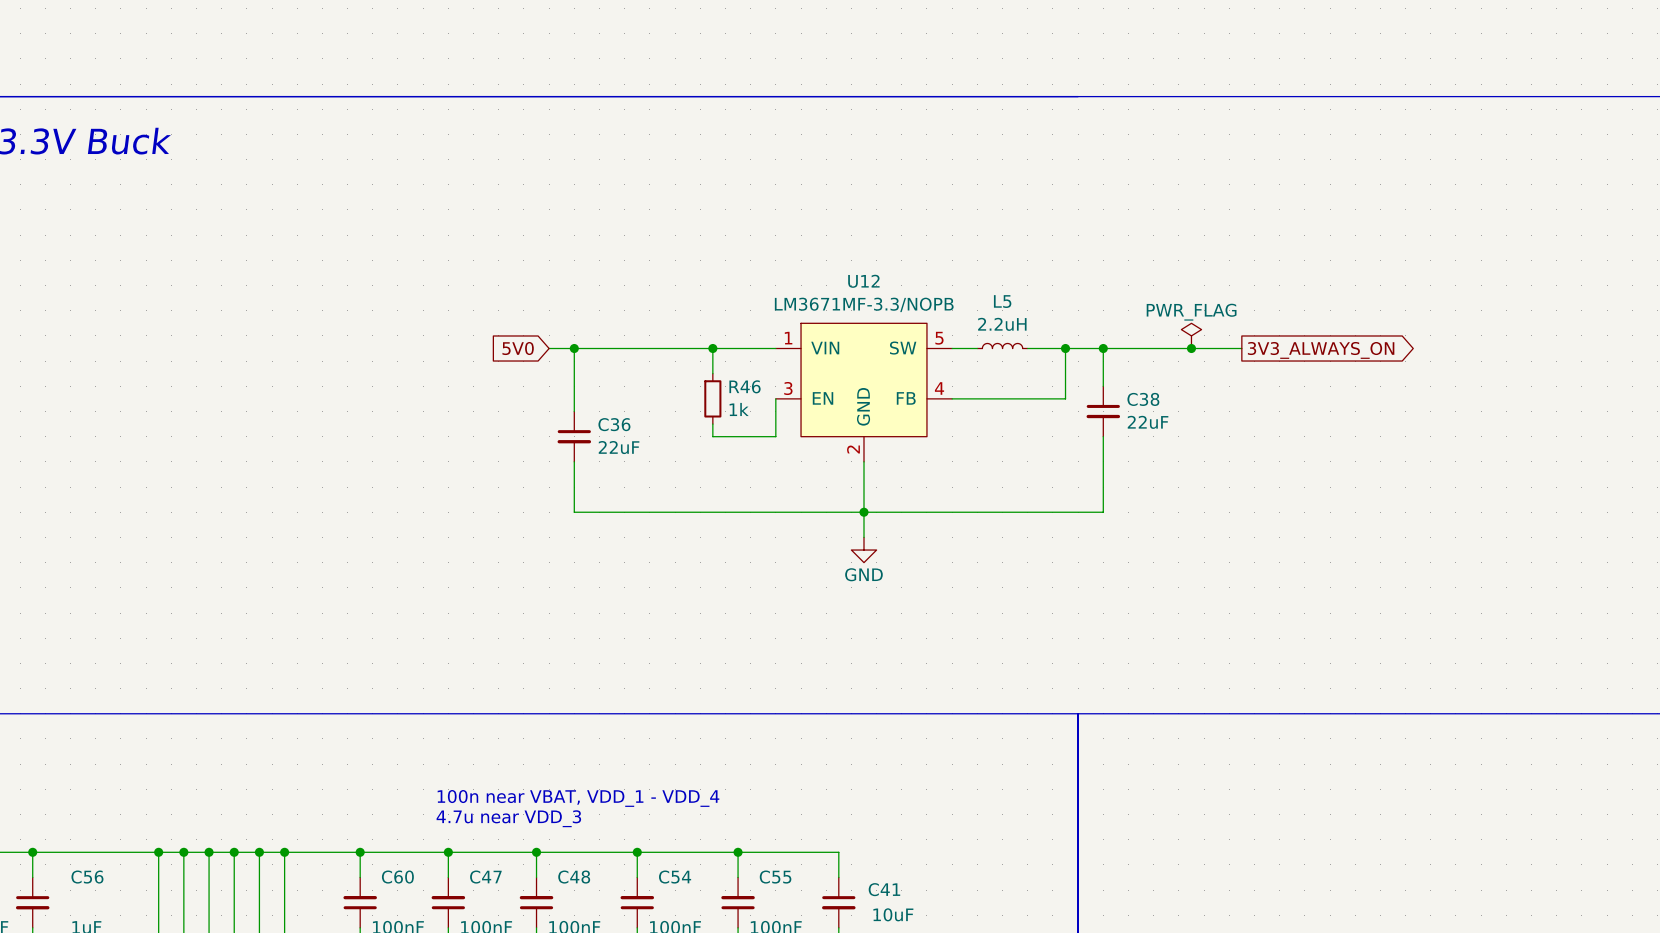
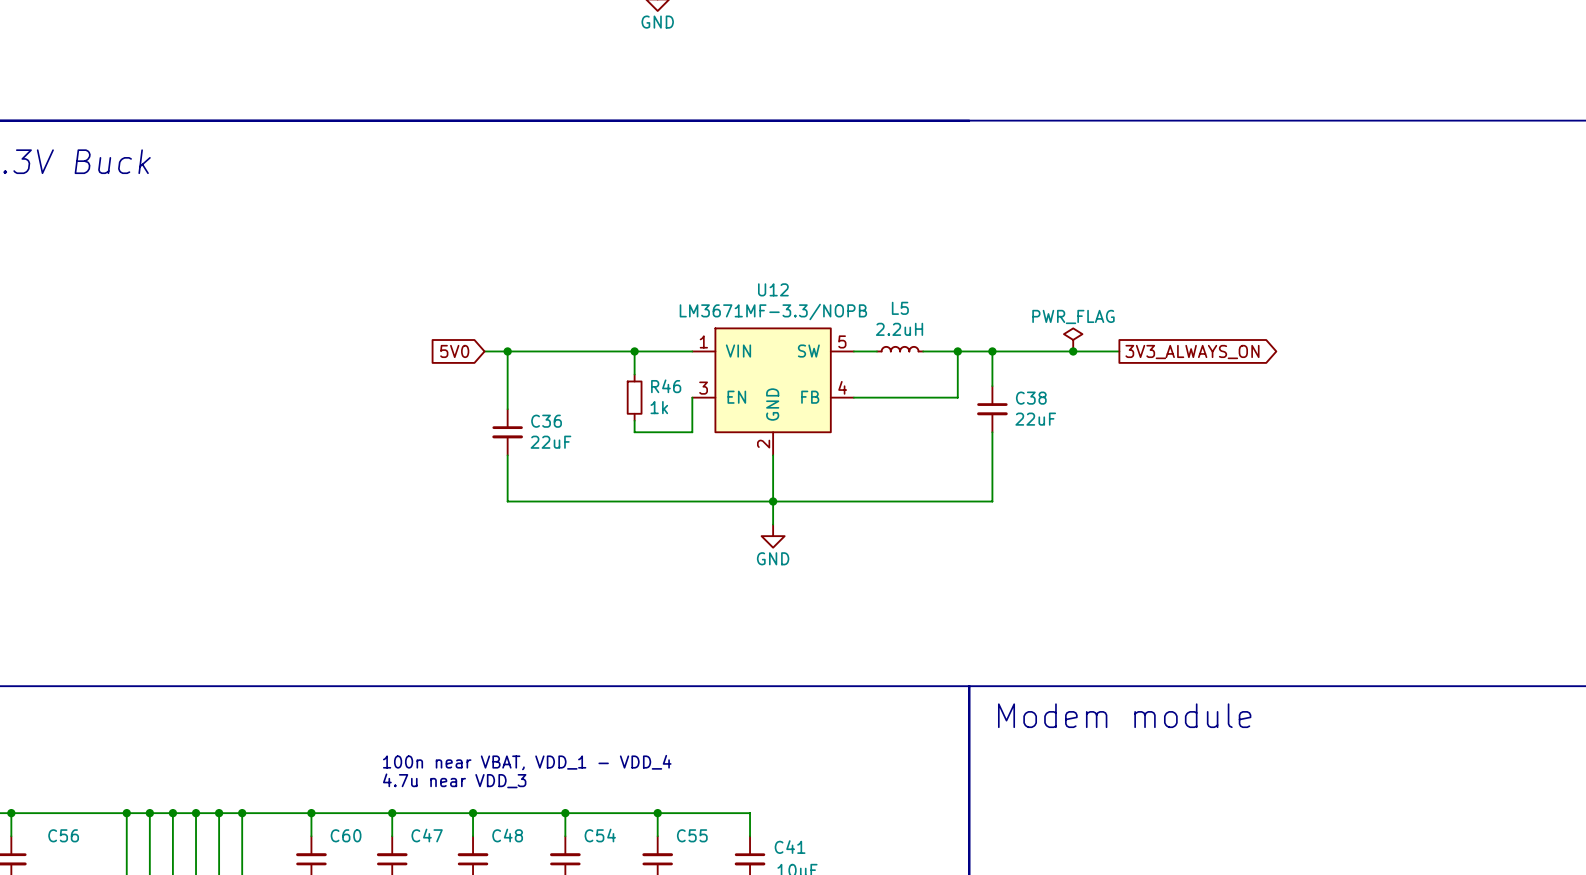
text: none -> Modem module (1124, 715)

